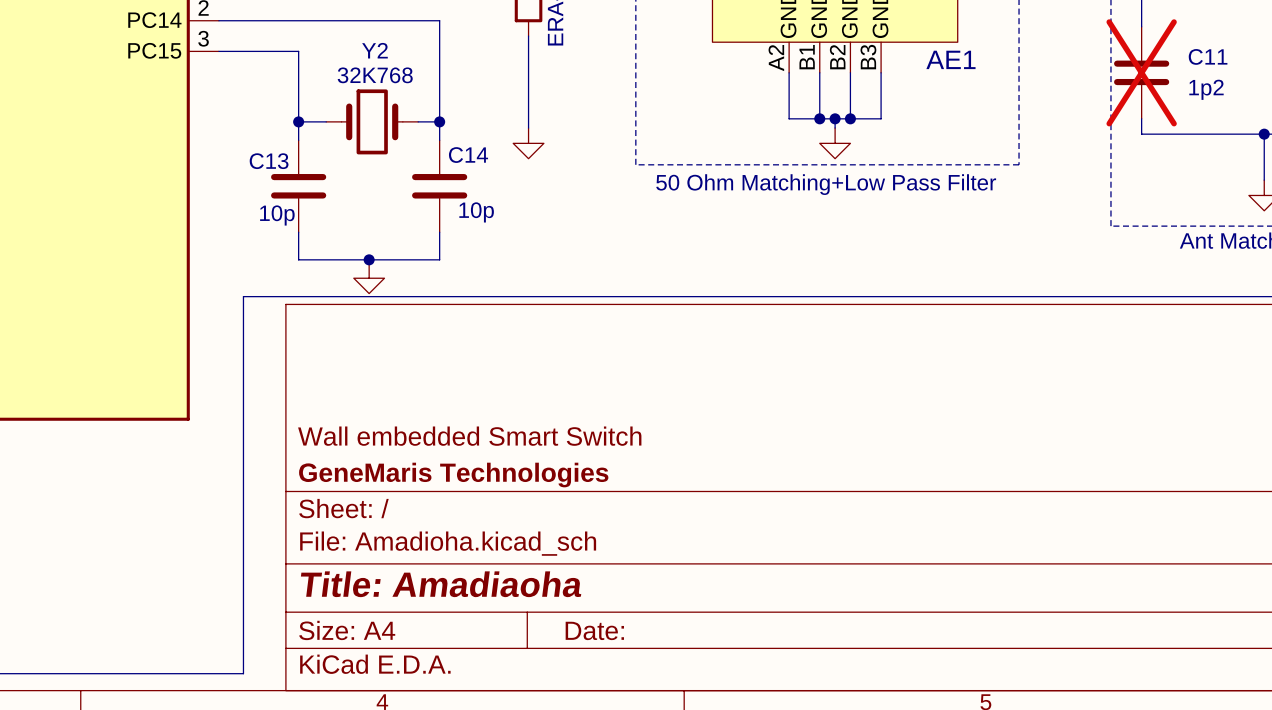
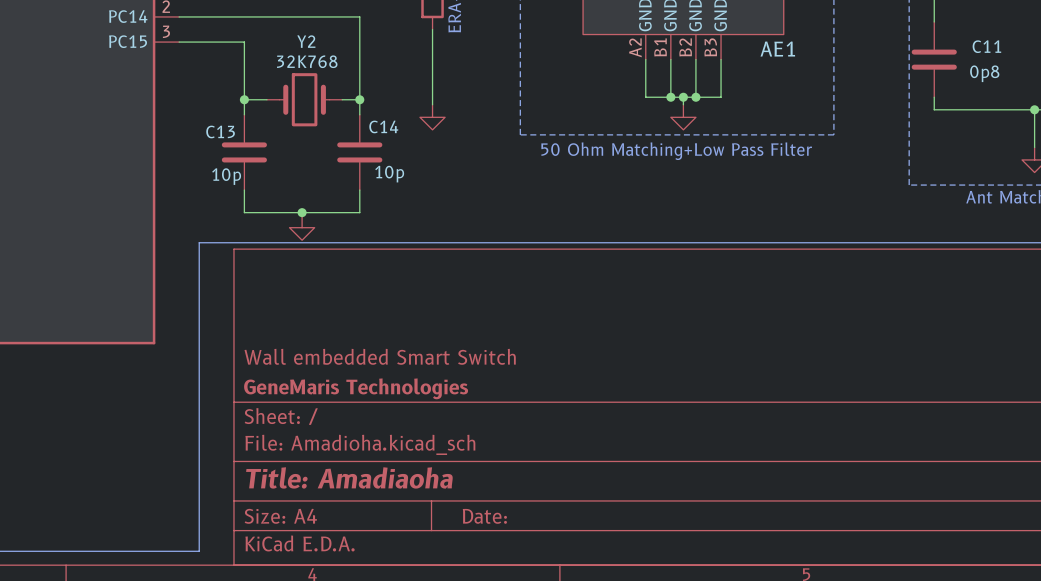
C11 do-not-place cross: (1141, 72) -> none
C11 value: 1p2 (1206, 89) -> 0p8 (984, 73)

